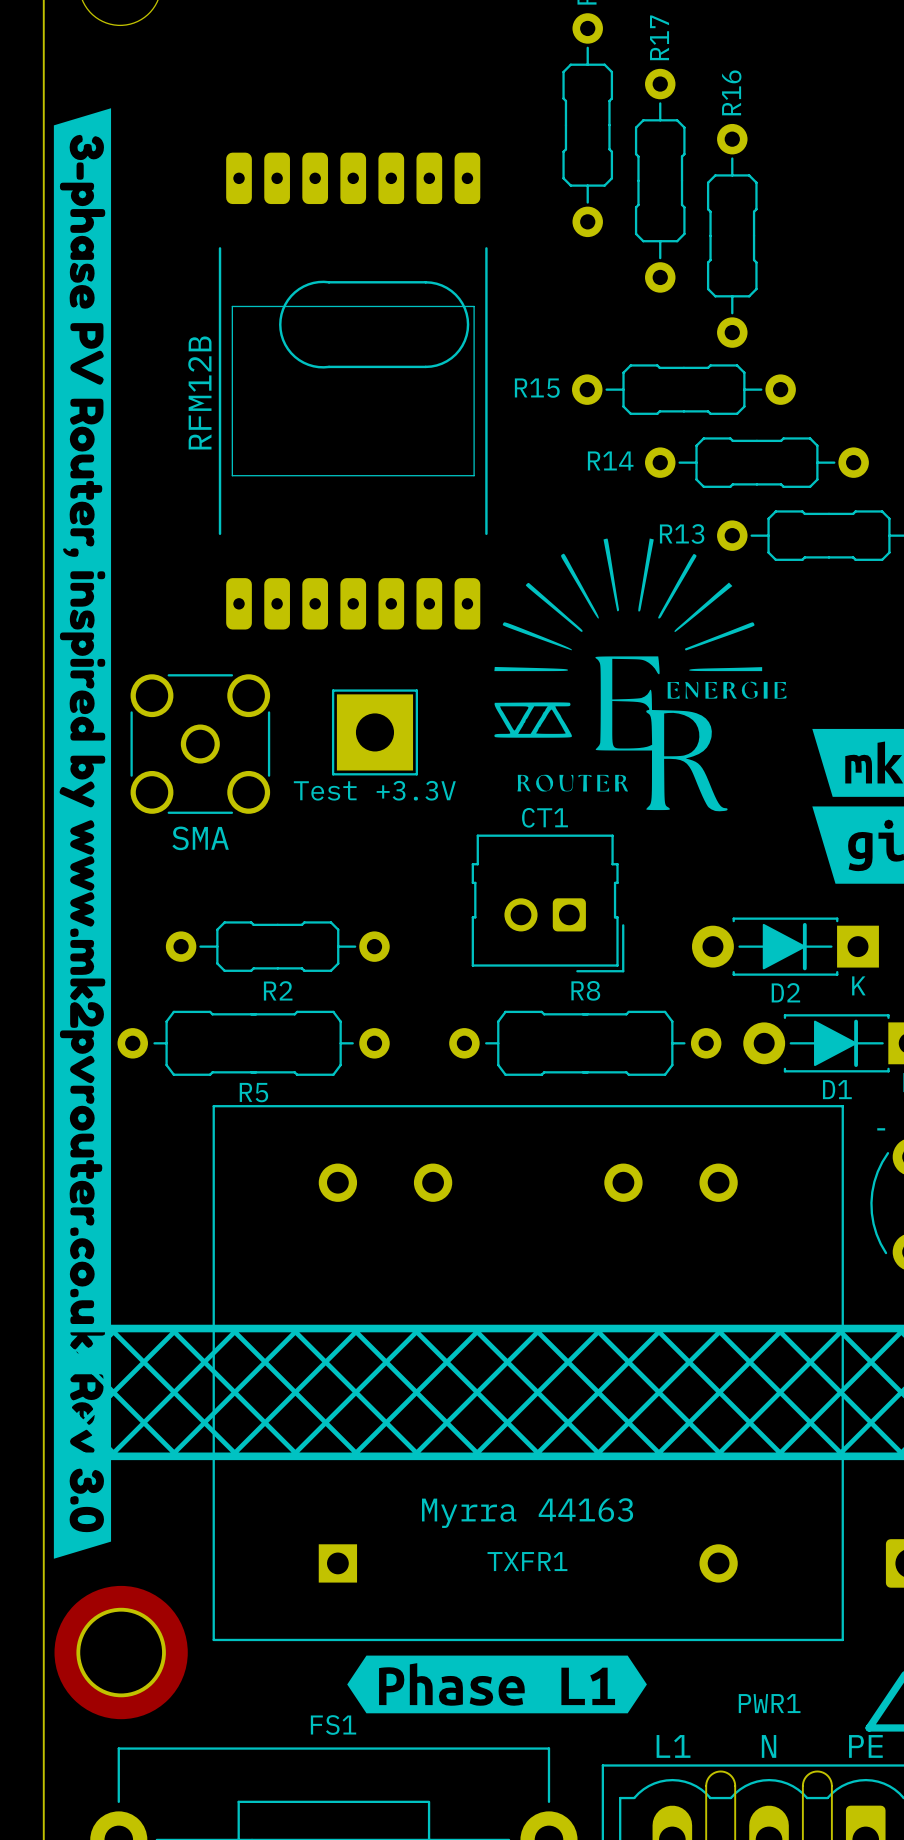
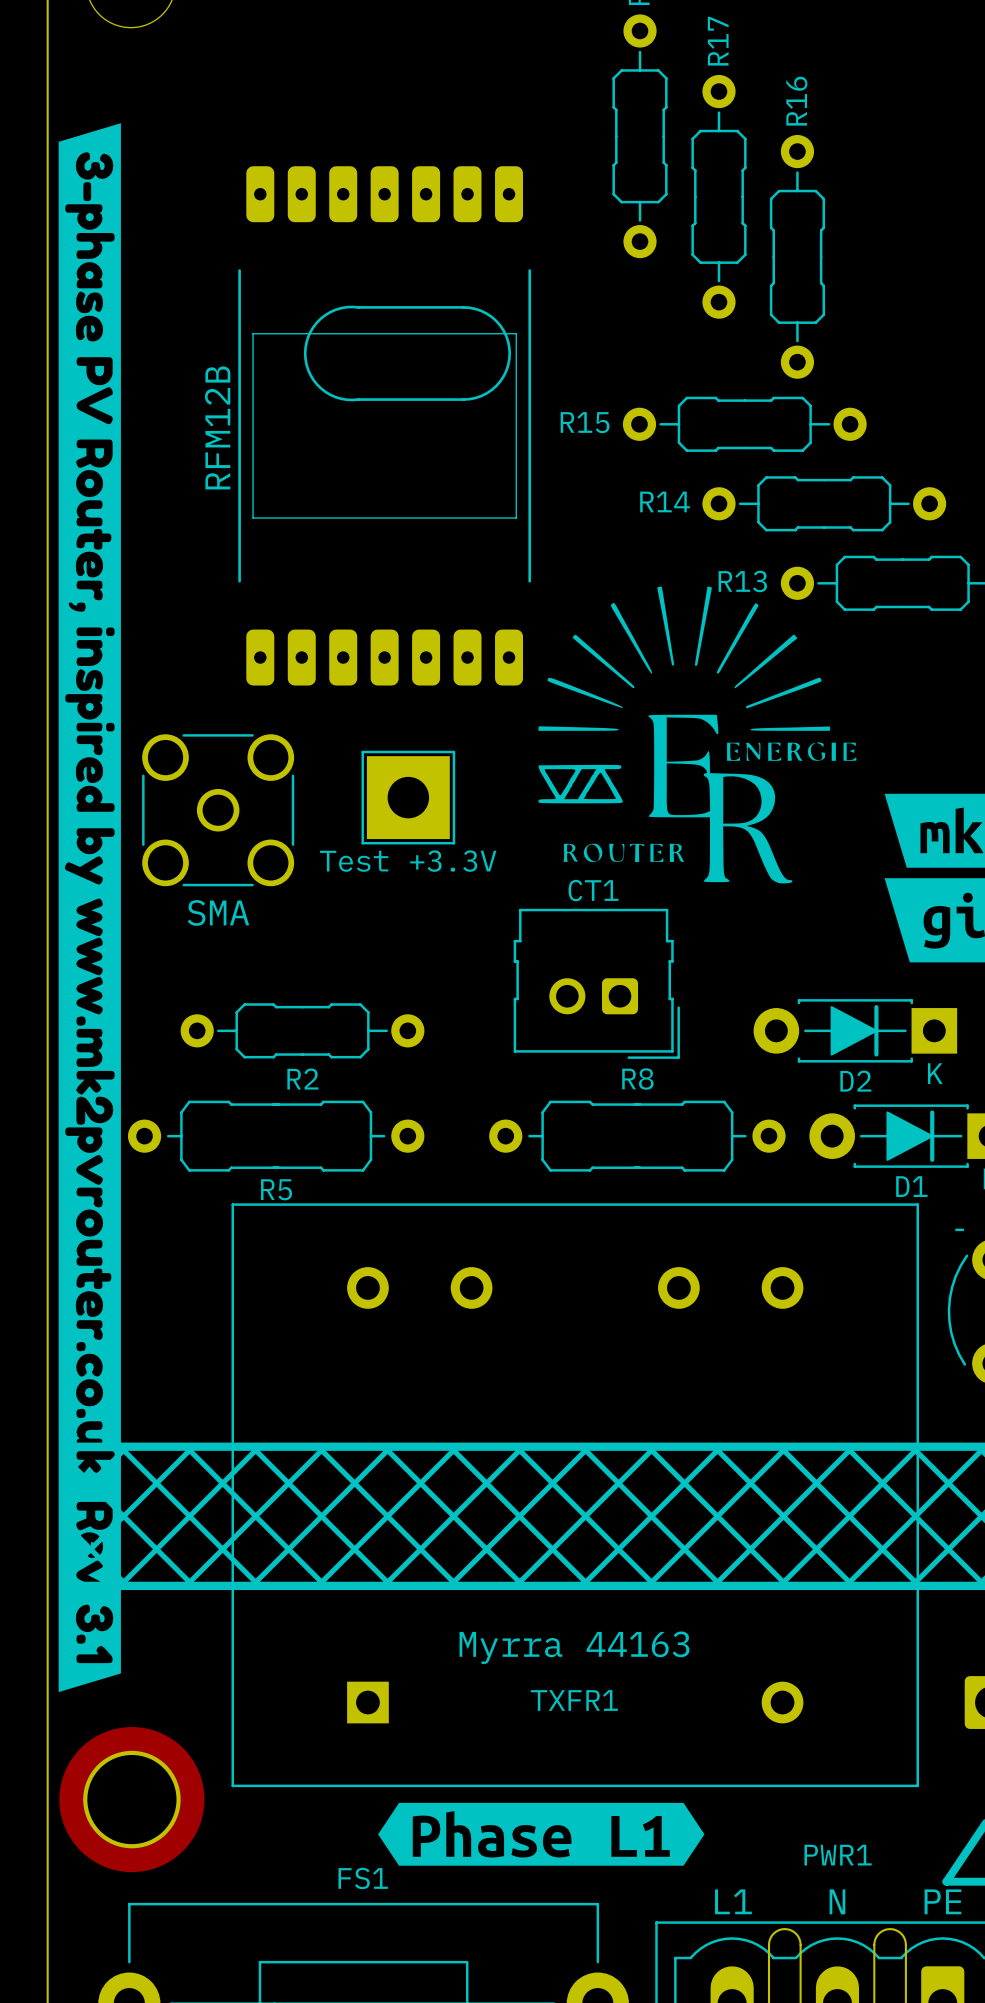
drawing shape: [53, 108, 112, 1559] -> [58, 123, 121, 1693]

